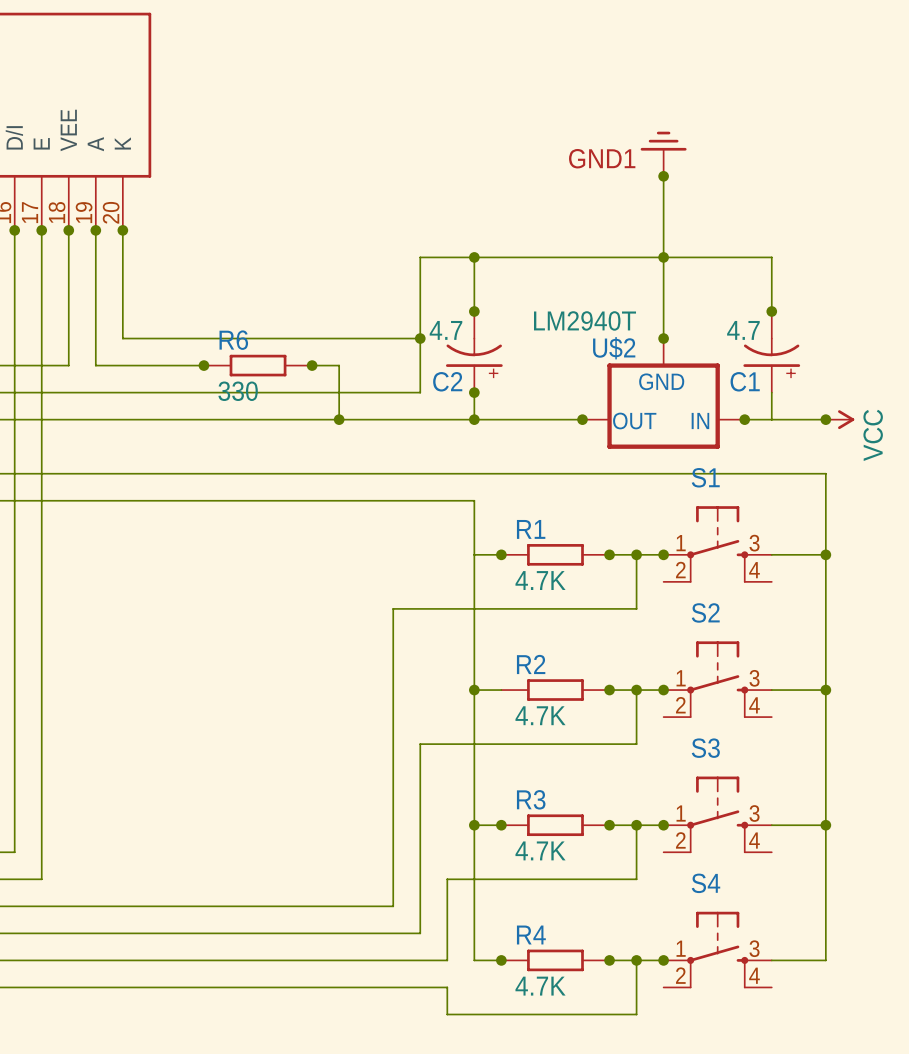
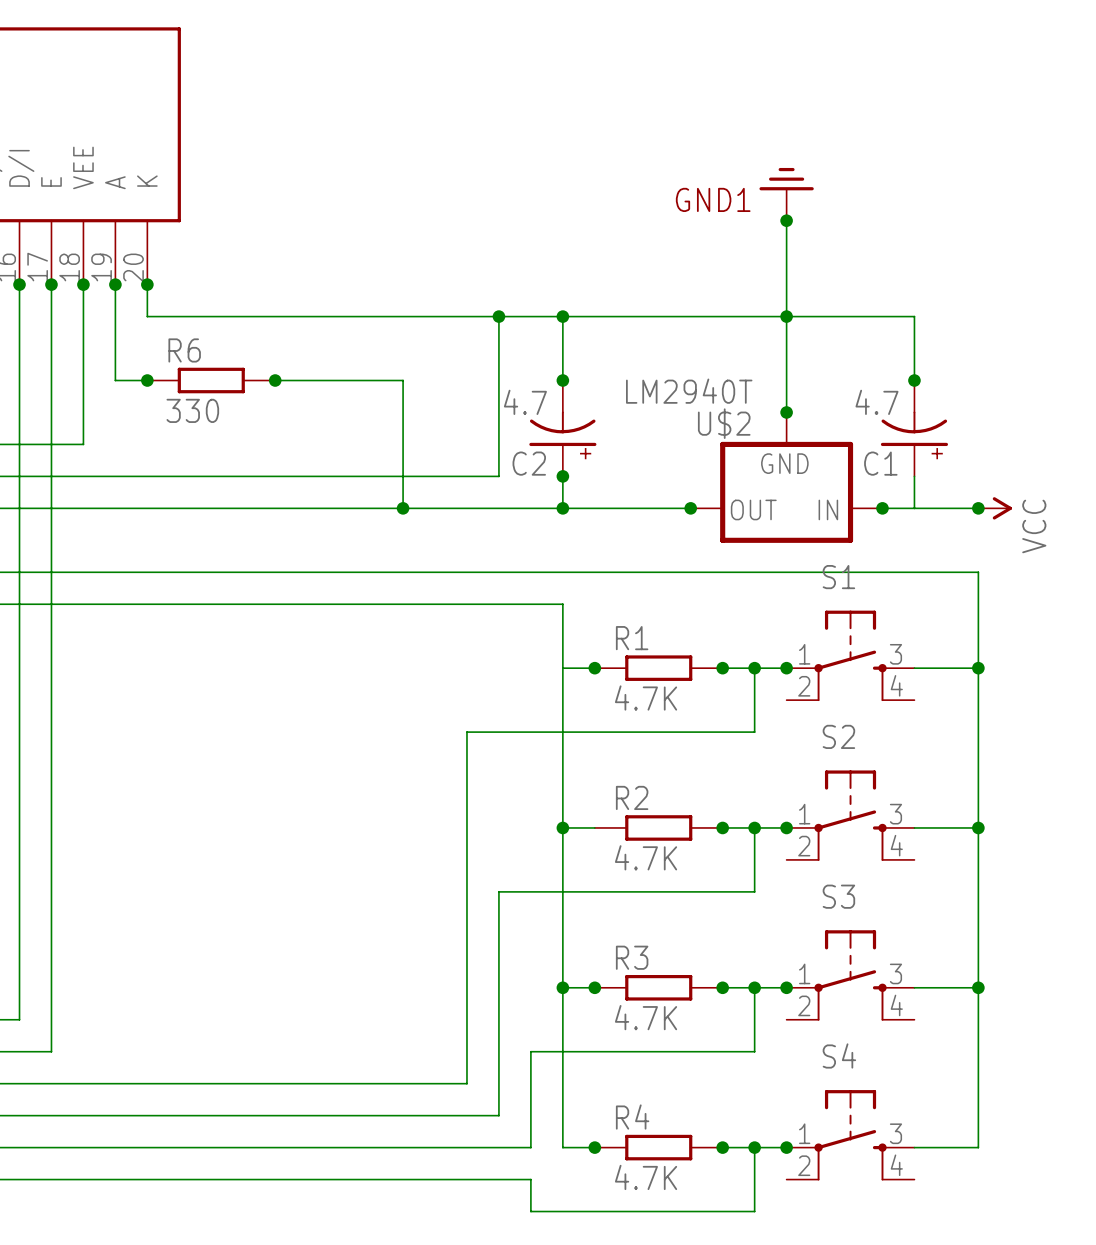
wire: (122, 257) (122, 338) (420, 338) -> (147, 316) (498, 316)
junction: none -> (498, 316)
wire: (95, 311) (95, 365) (203, 365) -> (115, 380) (147, 380)
junction: none -> (147, 380)
junction: none -> (275, 380)
junction: (420, 338) -> none
junction: (203, 365) -> none
R6 position: (258, 365) -> (211, 380)
wire: (312, 365) (339, 365) -> (275, 380) (403, 380) (403, 444)
junction: (312, 365) -> none

